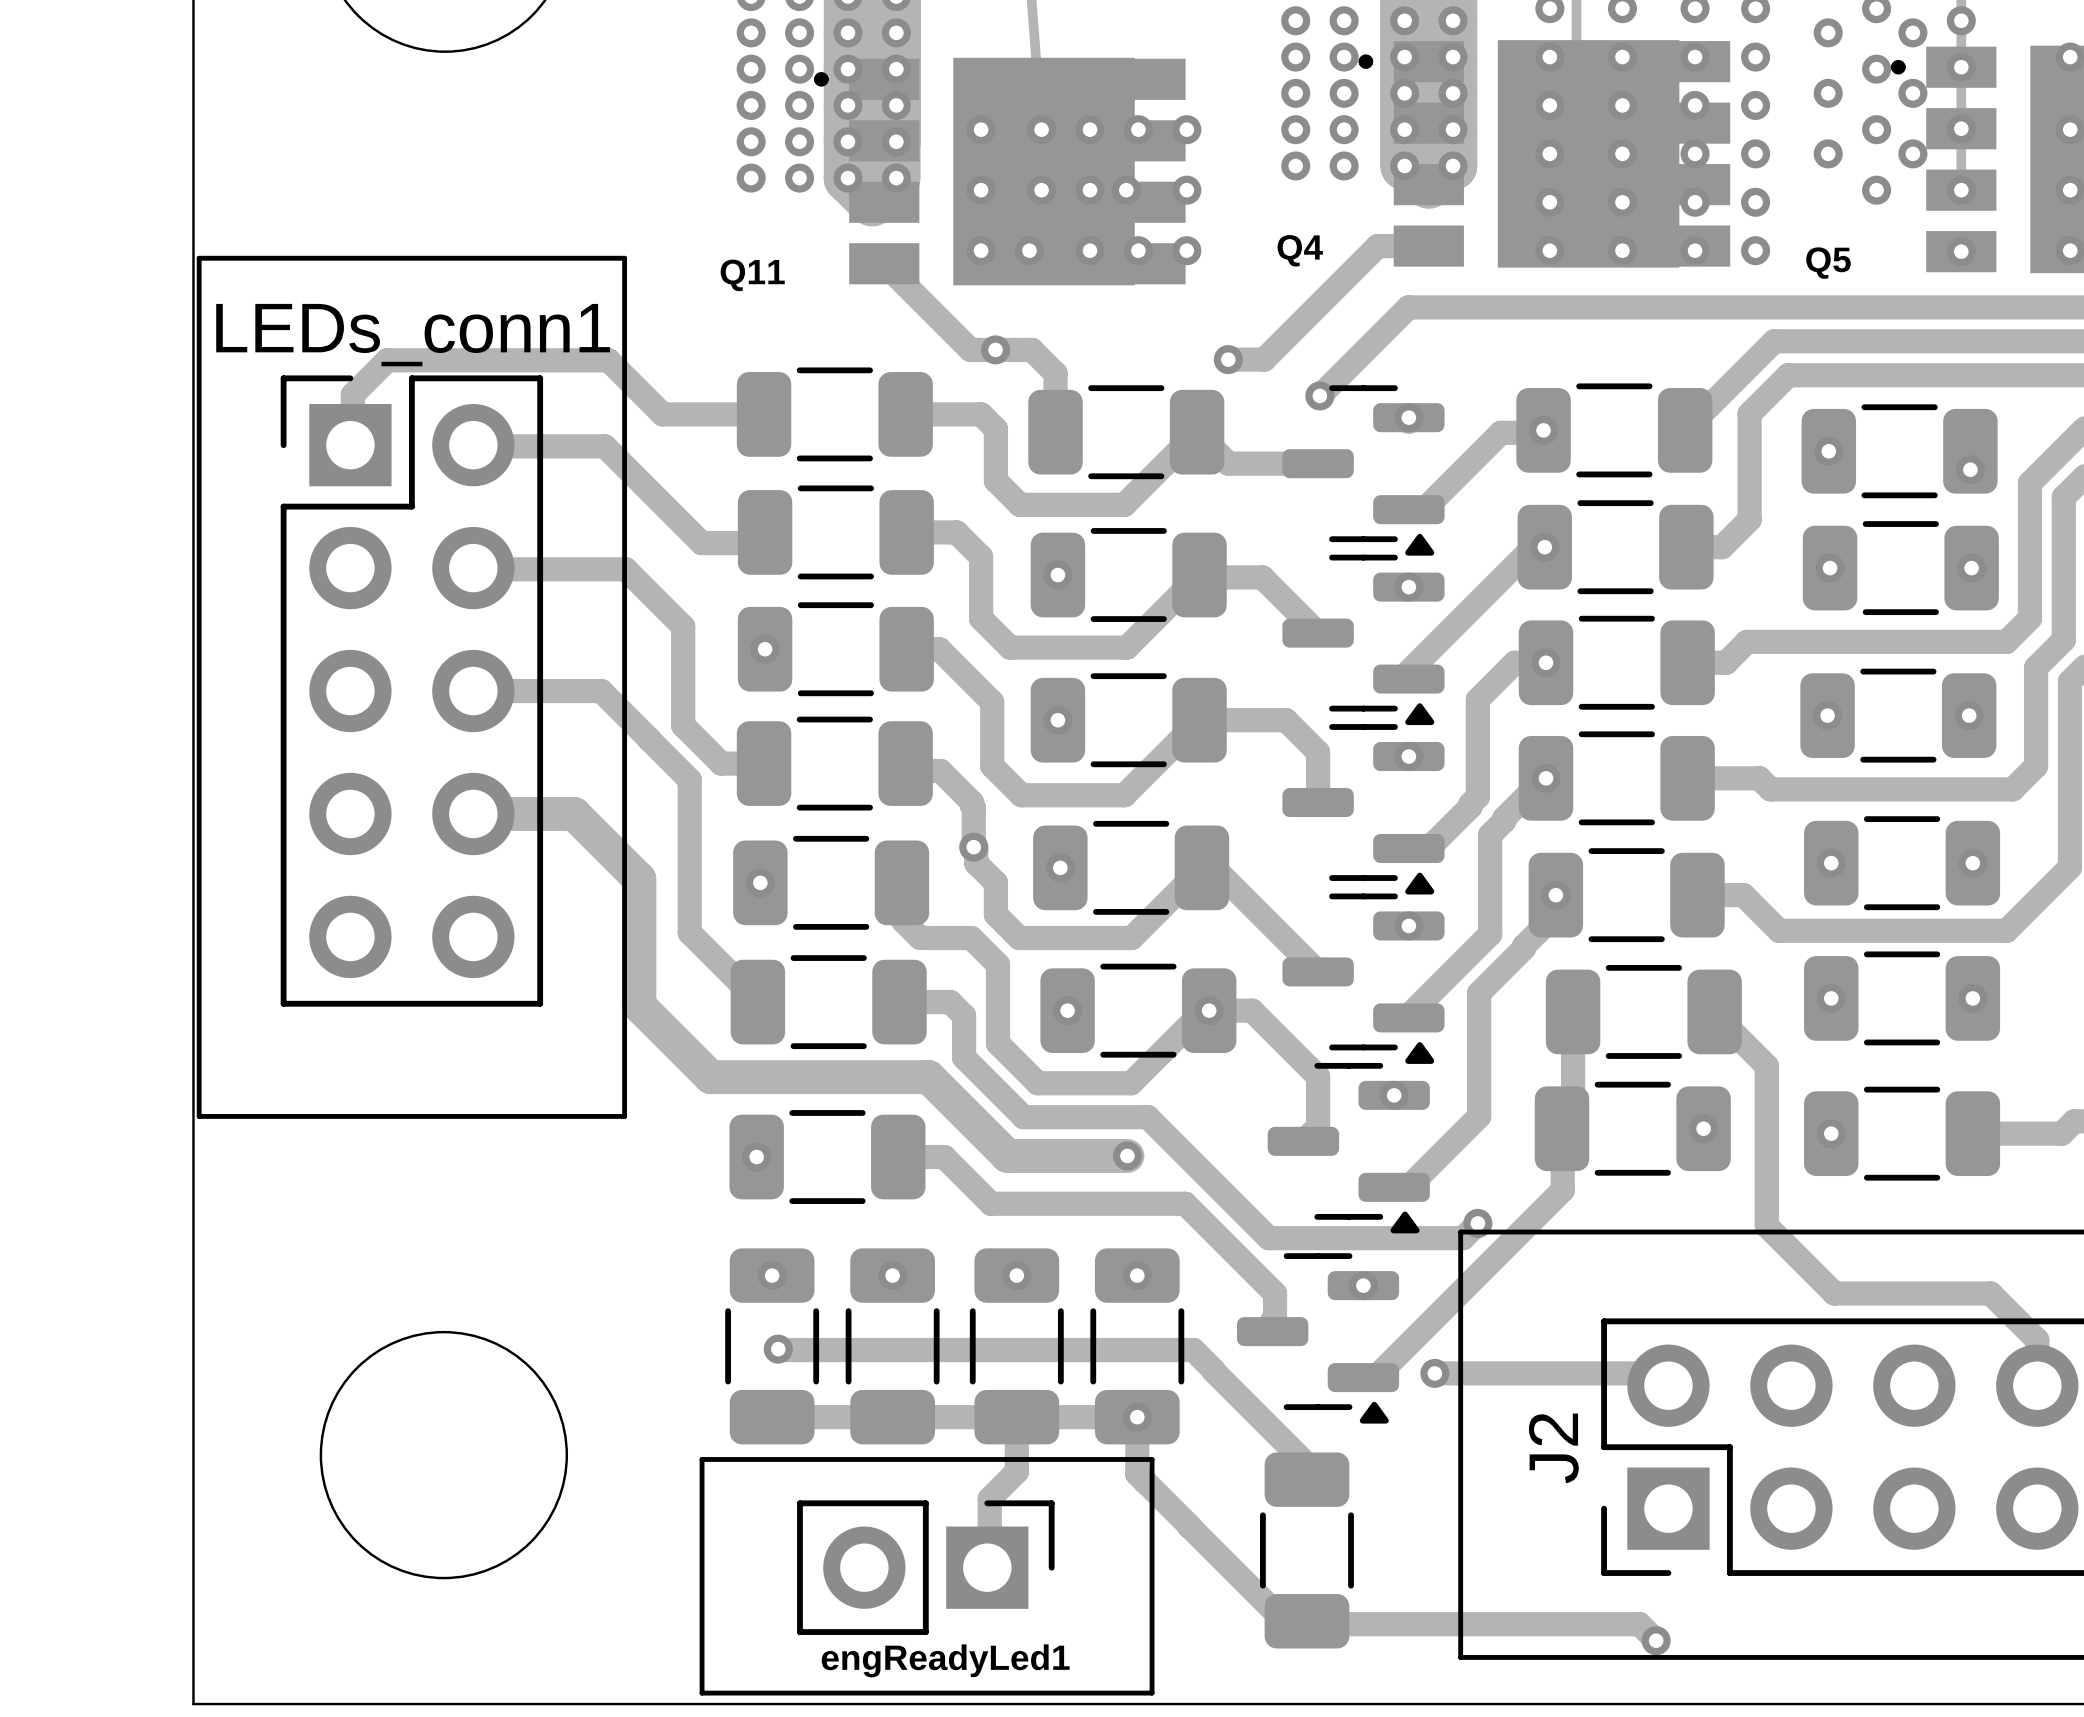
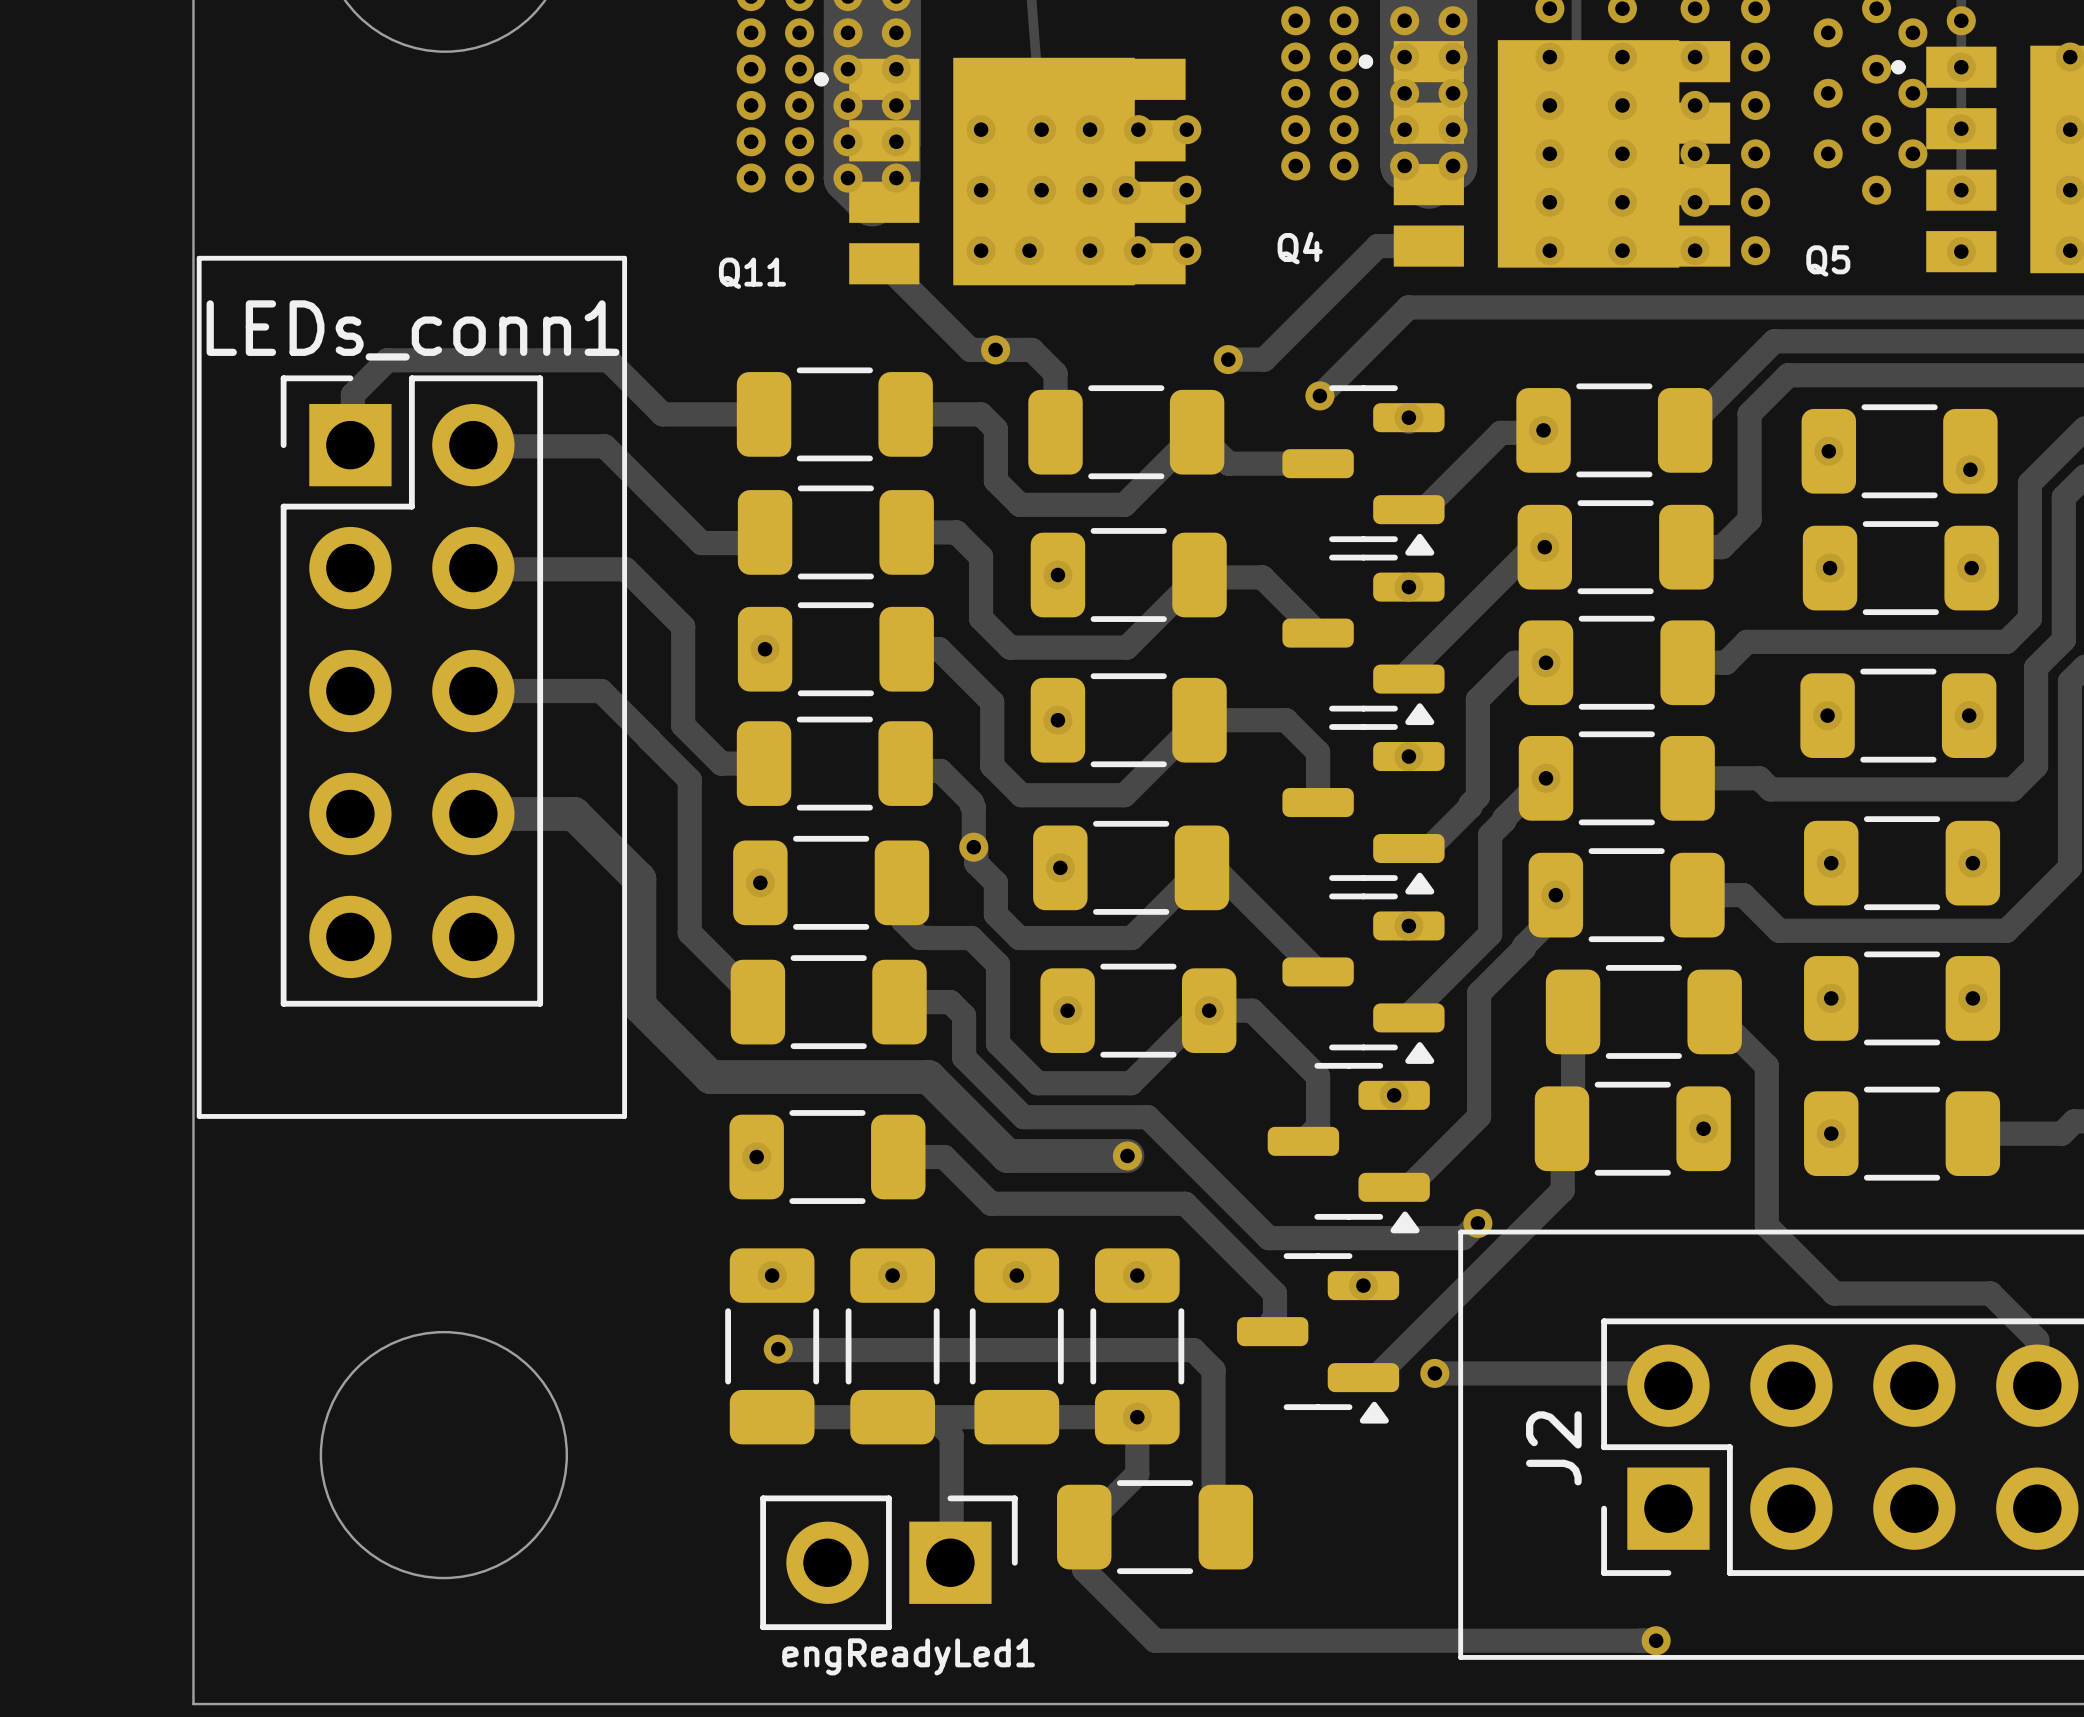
track: (1213, 1370) (1306, 1464) (1306, 1479) -> (1213, 1370) (1213, 1514) (1225, 1527)
track: none -> (932, 1417) (951, 1436) (950, 1562)
track: (1016, 1417) (1016, 1471) (989, 1498) (989, 1565) (987, 1567) -> none
line: (702, 1459) (1152, 1459) (1152, 1693) (702, 1693) (702, 1459) -> none
track: (1145, 1481) (1189, 1525) -> none
track: (1189, 1526) (1287, 1624) (1639, 1624) (1656, 1640) -> (1137, 1474) (1084, 1527) (1084, 1569) (1155, 1640) (1656, 1640)
part rotation: 0° (1306, 1550) -> 90° clockwise (1155, 1527)
part position: (1306, 1550) -> (1155, 1527)
engReadyLed1 position: (925, 1567) -> (888, 1562)

